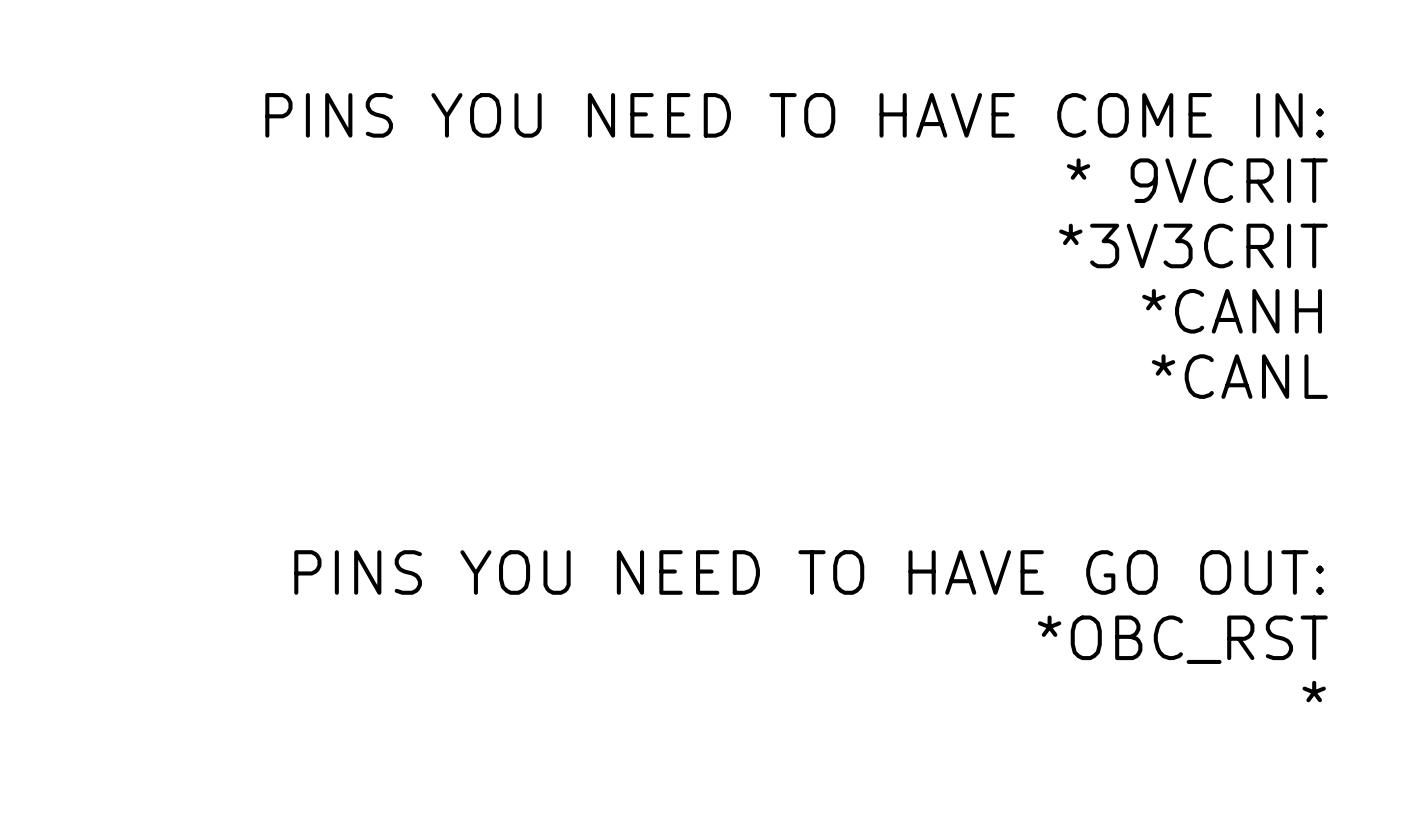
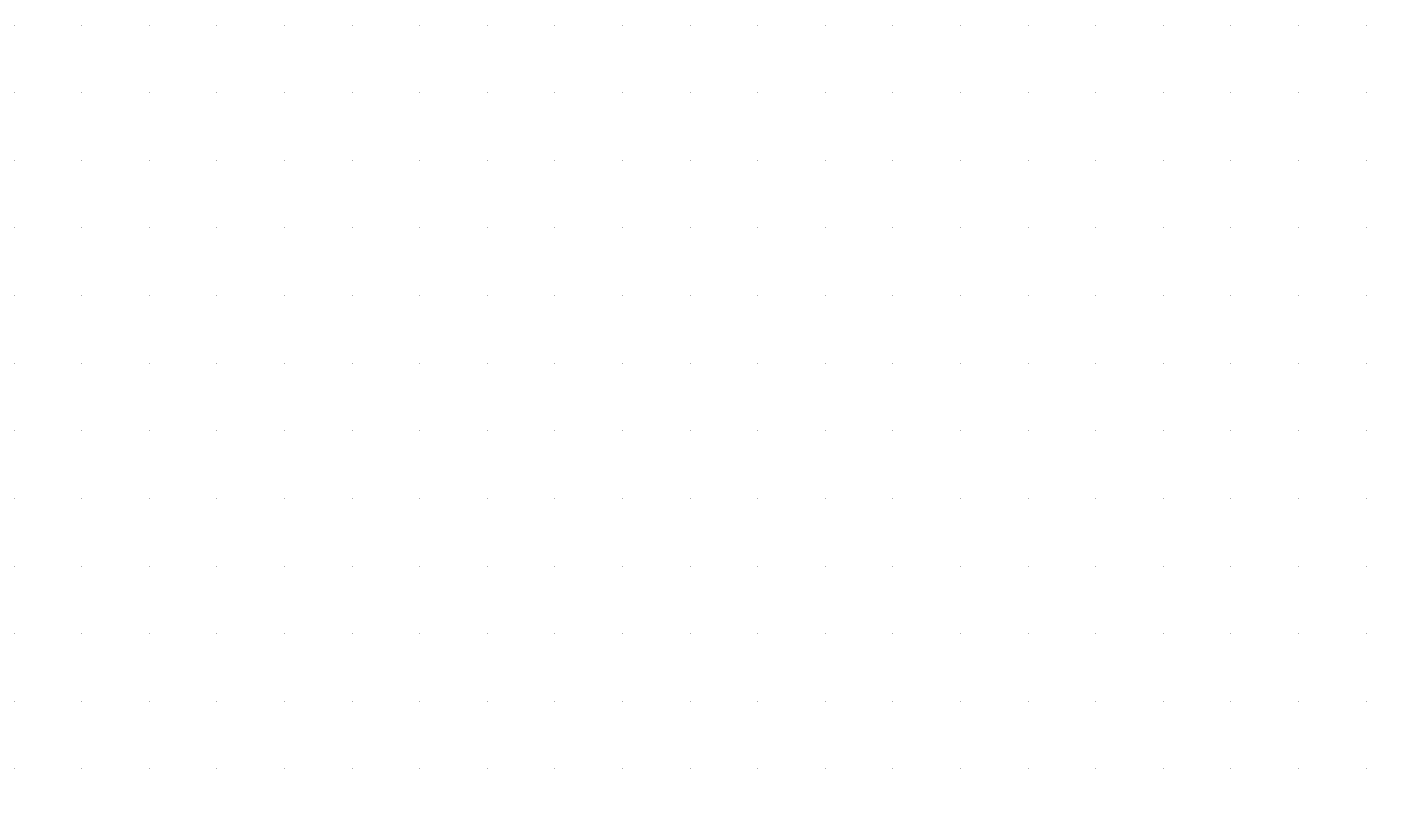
text: PINS YOU NEED TO HAVE COME IN: (794, 115) -> none
text: * 9VCRIT (1197, 180) -> none
text: *3V3CRIT (1193, 245) -> none
text: *CANH (1232, 311) -> none
text: *CANL (1239, 376) -> none
text: PINS YOU NEED TO HAVE GO OUT: (809, 572) -> none
text: *OBC_RST (1182, 639) -> none
text: * (1314, 691) -> none

